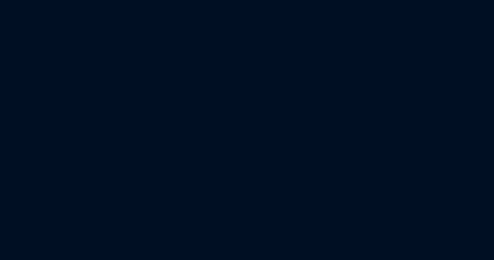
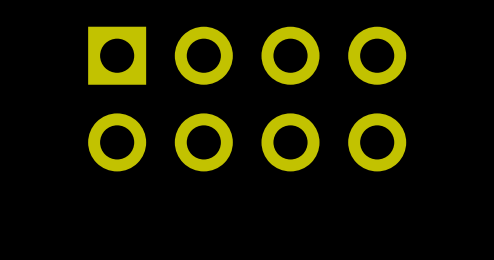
part: none -> (247, 99)

